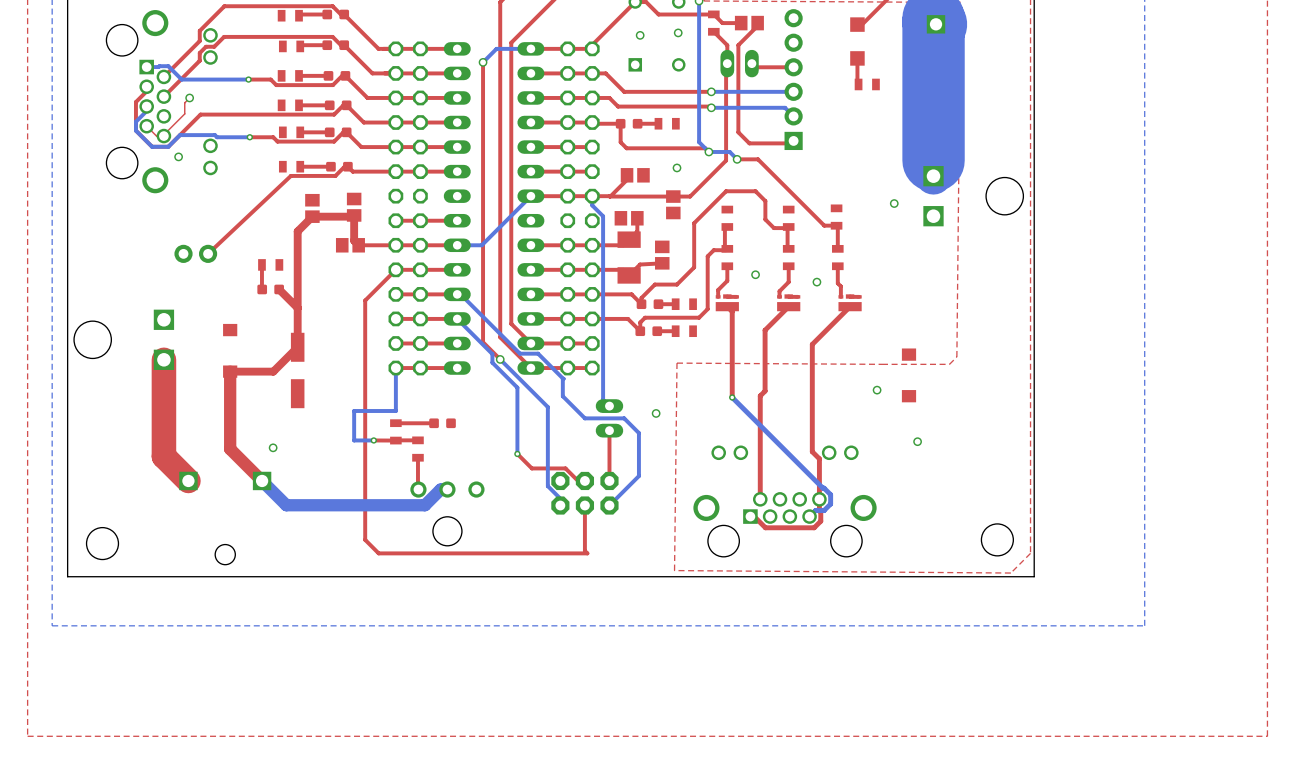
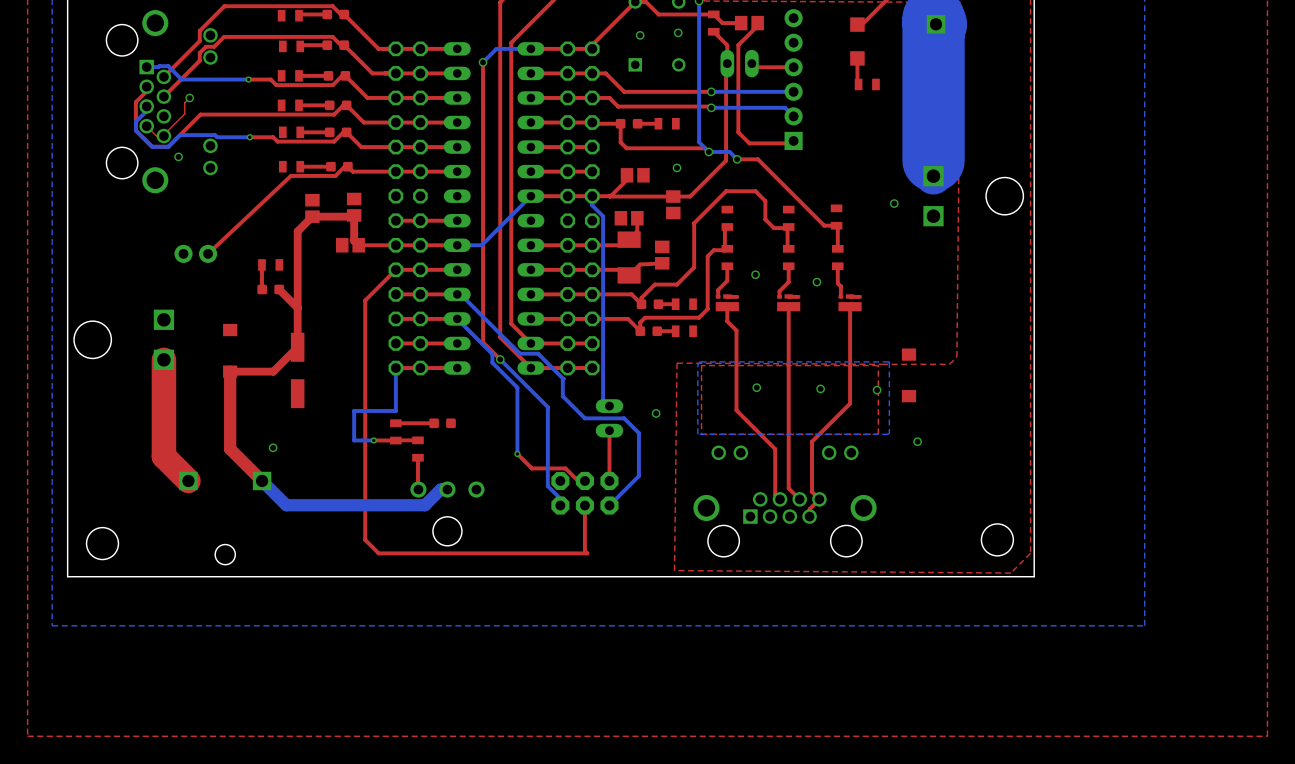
top track: (727, 306) (732, 311) (732, 397) -> (727, 306) (727, 321) (736, 330) (736, 410) (775, 449) (775, 494) (779, 499)
top track: (788, 306) (765, 330) (765, 391) (760, 395) (760, 499) -> (788, 306) (788, 488) (799, 499)
top track: (850, 306) (812, 344) (812, 451) (819, 458) (820, 521) (814, 527) (765, 527) (754, 516) (750, 516) -> (850, 306) (850, 403) (812, 441) (812, 491) (819, 499) (809, 509) (809, 516)
bottom zone outline: none -> (889, 361) (888, 434) (697, 434) (697, 364) (700, 361) (889, 361)
top zone outline: none -> (878, 365) (701, 365) (701, 434) (878, 434) (878, 365)
via: none -> (756, 387)
via: none -> (820, 388)
bottom track: (732, 397) (830, 494) (830, 504) (824, 510) (815, 510) (809, 516) -> none
via: (732, 397) -> none

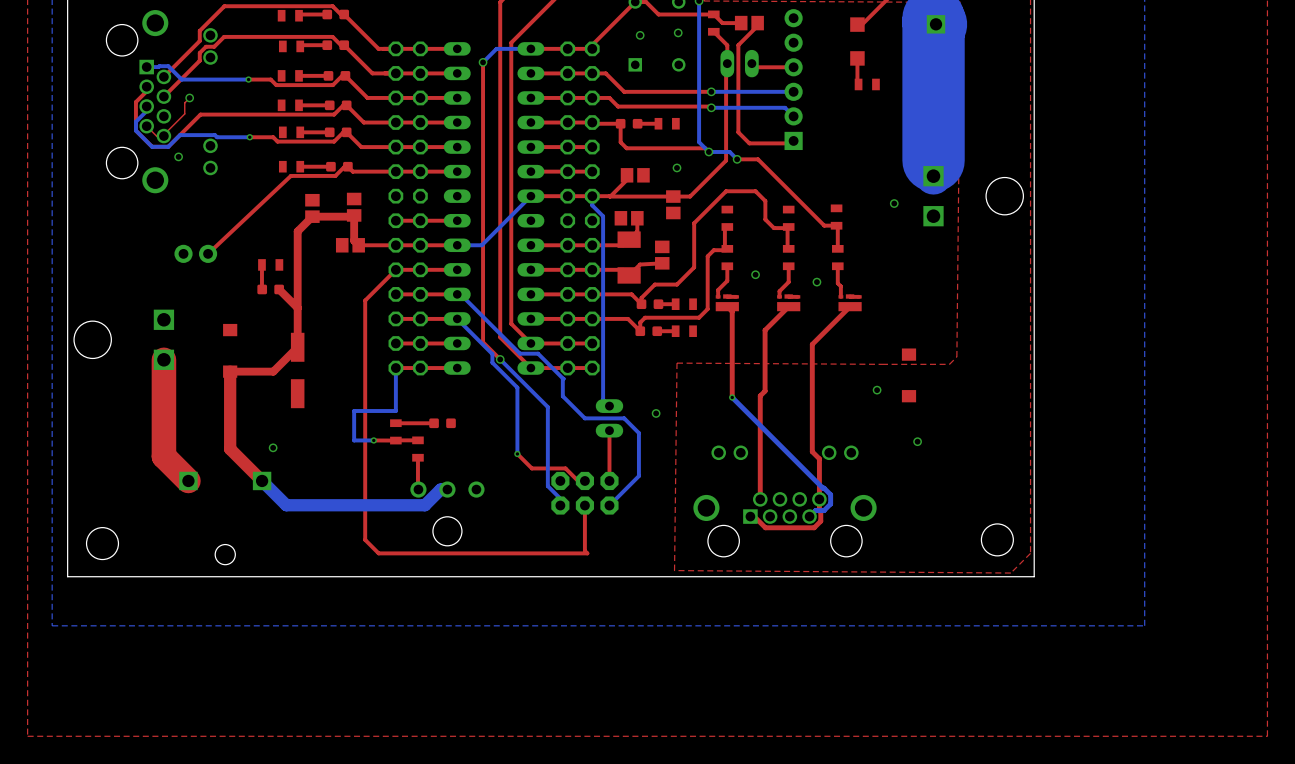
top track: (727, 306) (727, 321) (736, 330) (736, 410) (775, 449) (775, 494) (779, 499) -> (727, 306) (732, 311) (732, 397)
top track: (788, 306) (788, 488) (799, 499) -> (788, 306) (765, 330) (765, 391) (760, 395) (760, 499)
top track: (850, 306) (850, 403) (812, 441) (812, 491) (819, 499) (809, 509) (809, 516) -> (850, 306) (812, 344) (812, 451) (819, 458) (820, 521) (814, 527) (765, 527) (754, 516) (750, 516)
bottom zone outline: (889, 361) (888, 434) (697, 434) (697, 364) (700, 361) (889, 361) -> none
top zone outline: (878, 365) (701, 365) (701, 434) (878, 434) (878, 365) -> none
via: (756, 387) -> none
via: (820, 388) -> none
bottom track: none -> (732, 397) (830, 494) (830, 504) (824, 510) (815, 510) (809, 516)
via: none -> (732, 397)

